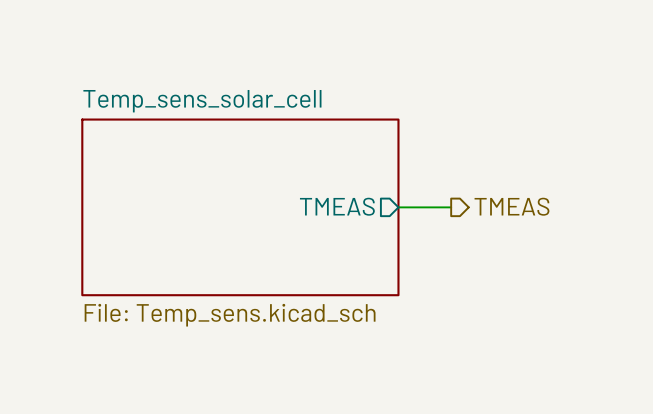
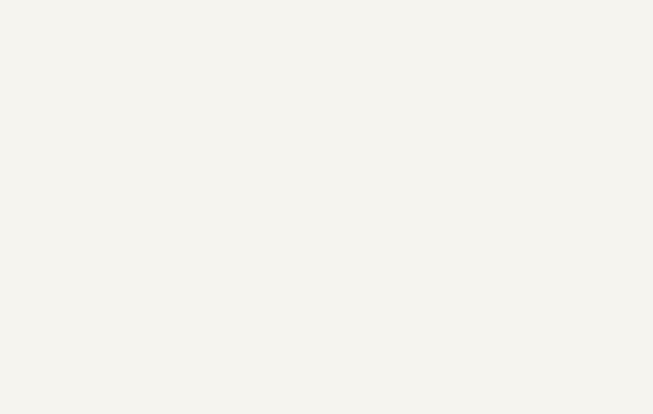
sheet pin: TMEAS (337, 206) -> none
hierarchical label: TMEAS (511, 206) -> none
sheet Temp_sens_solar_cell: File: Temp_sens.kicad_sch (240, 207) -> none
wire: (398, 207) (451, 207) -> none

